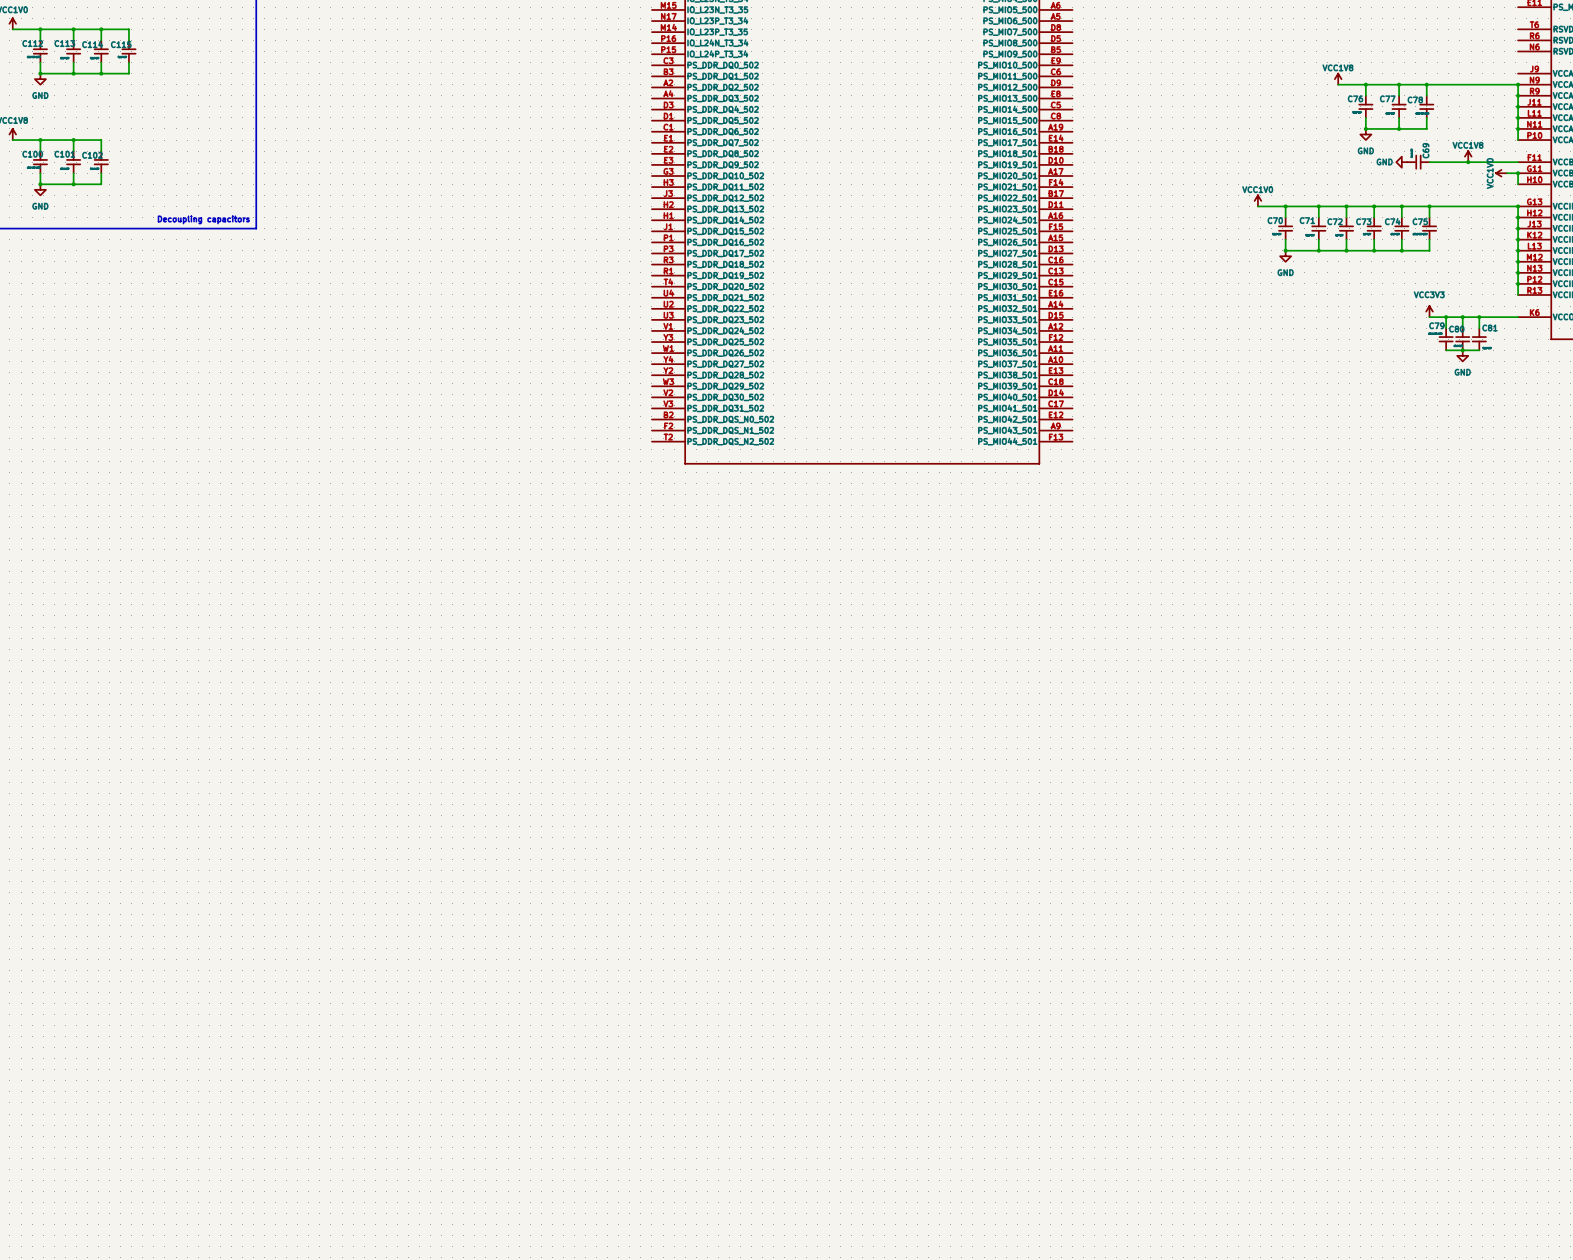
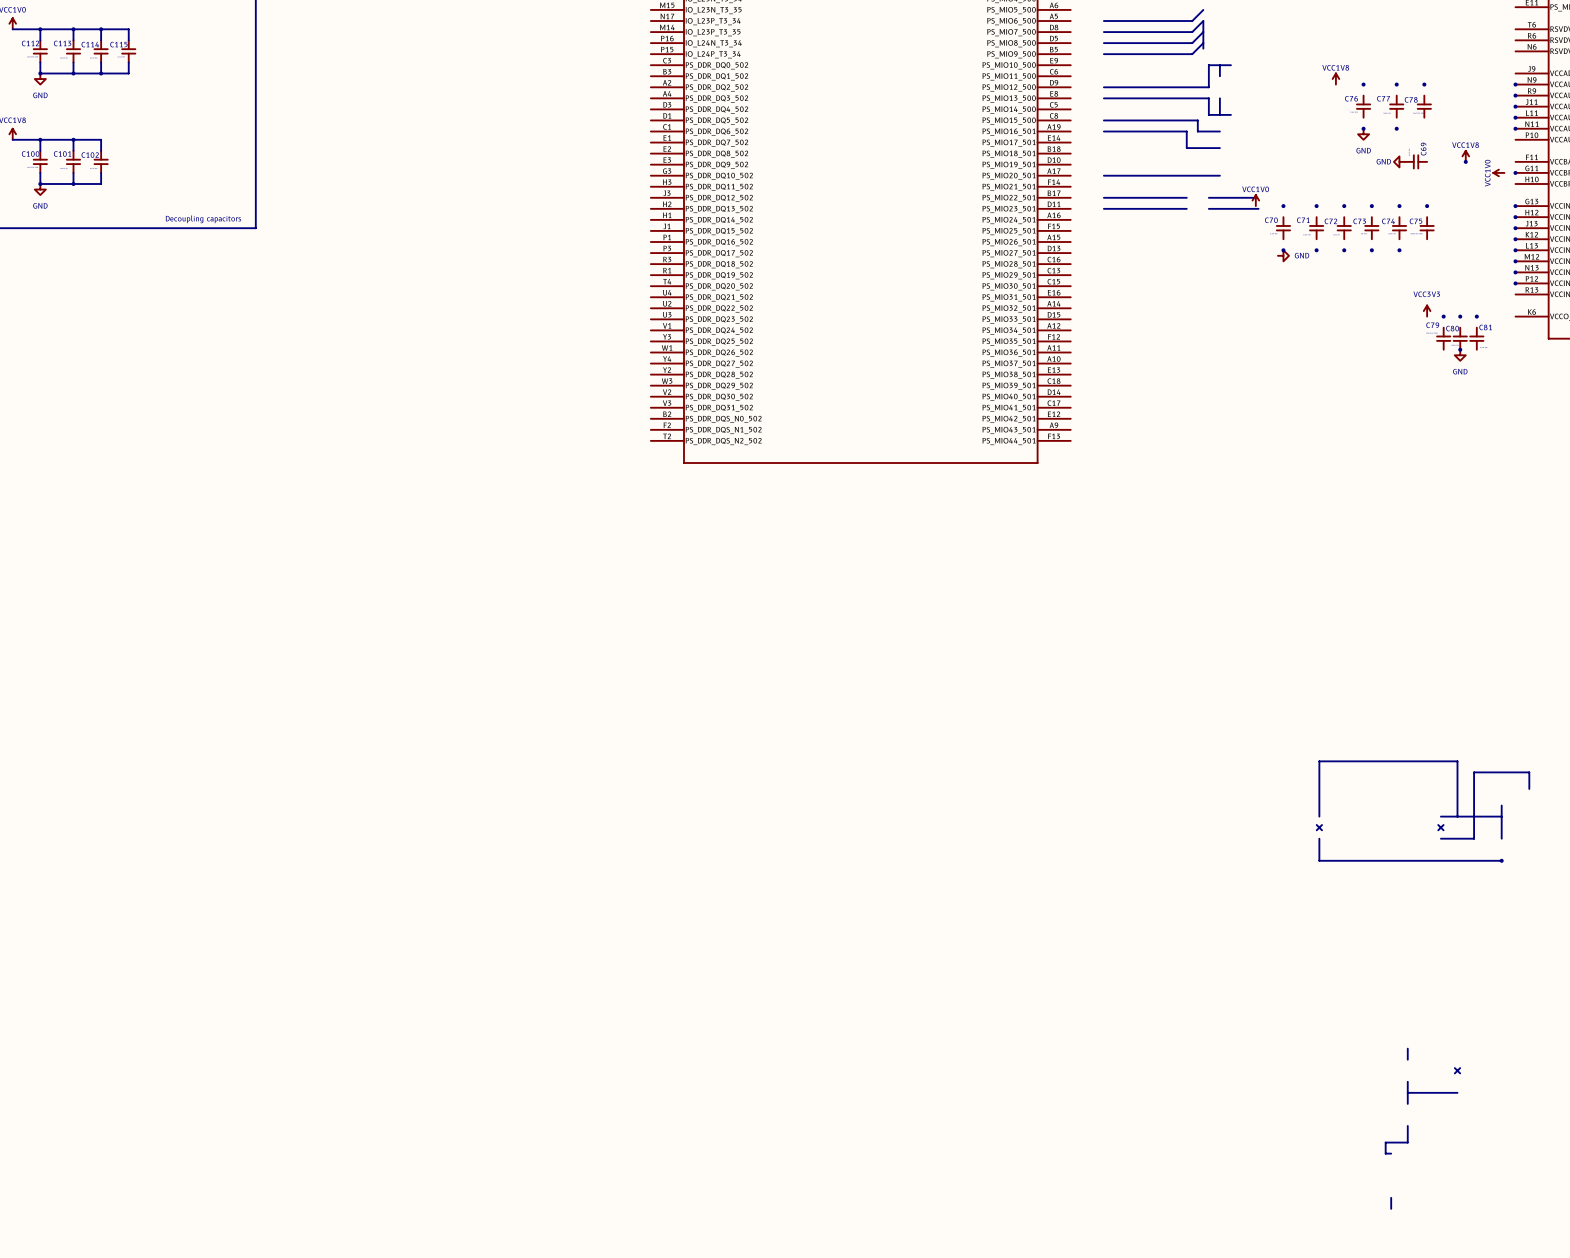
wire: none -> (1203, 9) (1192, 21)
wire: none -> (1103, 21) (1192, 21)
wire: none -> (1203, 21) (1192, 32) (1103, 32)
bus: none -> (1203, 21) (1203, 48)
wire: none -> (1203, 32) (1192, 43) (1103, 43)
wire: none -> (1203, 43) (1192, 54) (1103, 54)
wire: none -> (1219, 65) (1219, 76)
wire: none -> (1230, 65) (1208, 65) (1208, 87) (1103, 87)
wire: (1338, 84) (1518, 84) (1518, 140) -> none
wire: (1365, 84) (1365, 95) -> none
wire: (1399, 84) (1399, 95) -> none
wire: (1426, 84) (1426, 95) -> none
wire: none -> (1103, 98) (1208, 98) (1208, 114) (1230, 114)
wire: none -> (1219, 98) (1219, 114)
wire: (1365, 117) (1365, 128) (1426, 128) (1426, 117) -> none
wire: (1399, 117) (1399, 128) -> none
wire: none -> (1103, 120) (1197, 120) (1197, 131) (1219, 131)
wire: none -> (1103, 131) (1186, 131) (1186, 148) (1219, 148)
wire: (1429, 162) (1518, 162) -> none
wire: (1506, 173) (1518, 173) (1518, 184) -> none
wire: none -> (1103, 175) (1219, 175)
wire: none -> (1103, 197) (1186, 197)
wire: none -> (1208, 197) (1253, 197)
wire: (1257, 206) (1518, 206) (1518, 294) -> none
wire: (1285, 206) (1285, 217) -> none
wire: (1318, 206) (1318, 217) -> none
wire: (1346, 206) (1346, 217) -> none
wire: (1374, 206) (1374, 217) -> none
wire: (1401, 206) (1401, 217) -> none
wire: (1429, 206) (1429, 217) -> none
wire: none -> (1103, 208) (1186, 208)
wire: none -> (1208, 208) (1258, 208)
wire: (1285, 239) (1285, 250) (1429, 250) (1429, 239) -> none
wire: (1318, 239) (1318, 250) -> none
wire: (1346, 239) (1346, 250) -> none
wire: (1374, 239) (1374, 250) -> none
wire: (1401, 239) (1401, 250) -> none
power symbol rotation: 0° (1285, 256) -> 90° counterclockwise (1283, 255)
wire: (1429, 317) (1518, 317) -> none
wire: (1446, 317) (1446, 328) -> none
wire: (1462, 317) (1462, 328) -> none
wire: (1479, 317) (1479, 328) -> none
wire: (1446, 350) (1479, 350) -> none
wire: none -> (1529, 788) (1529, 772) (1474, 772) (1474, 838) (1440, 838)
wire: none -> (1501, 805) (1501, 838)
wire: none -> (1319, 816) (1319, 761) (1457, 761) (1457, 816)
wire: none -> (1440, 816) (1501, 816)
no-connect mark: none -> (1319, 827)
no-connect mark: none -> (1440, 827)
wire: none -> (1319, 838) (1319, 860) (1501, 860)
junction: none -> (1501, 860)
wire: none -> (1407, 1048) (1407, 1059)
no-connect mark: none -> (1457, 1070)
wire: none -> (1407, 1081) (1407, 1103)
wire: none -> (1407, 1092) (1457, 1092)
wire: none -> (1407, 1125) (1407, 1142) (1385, 1142) (1385, 1153) (1391, 1153)
wire: none -> (1391, 1197) (1391, 1208)

